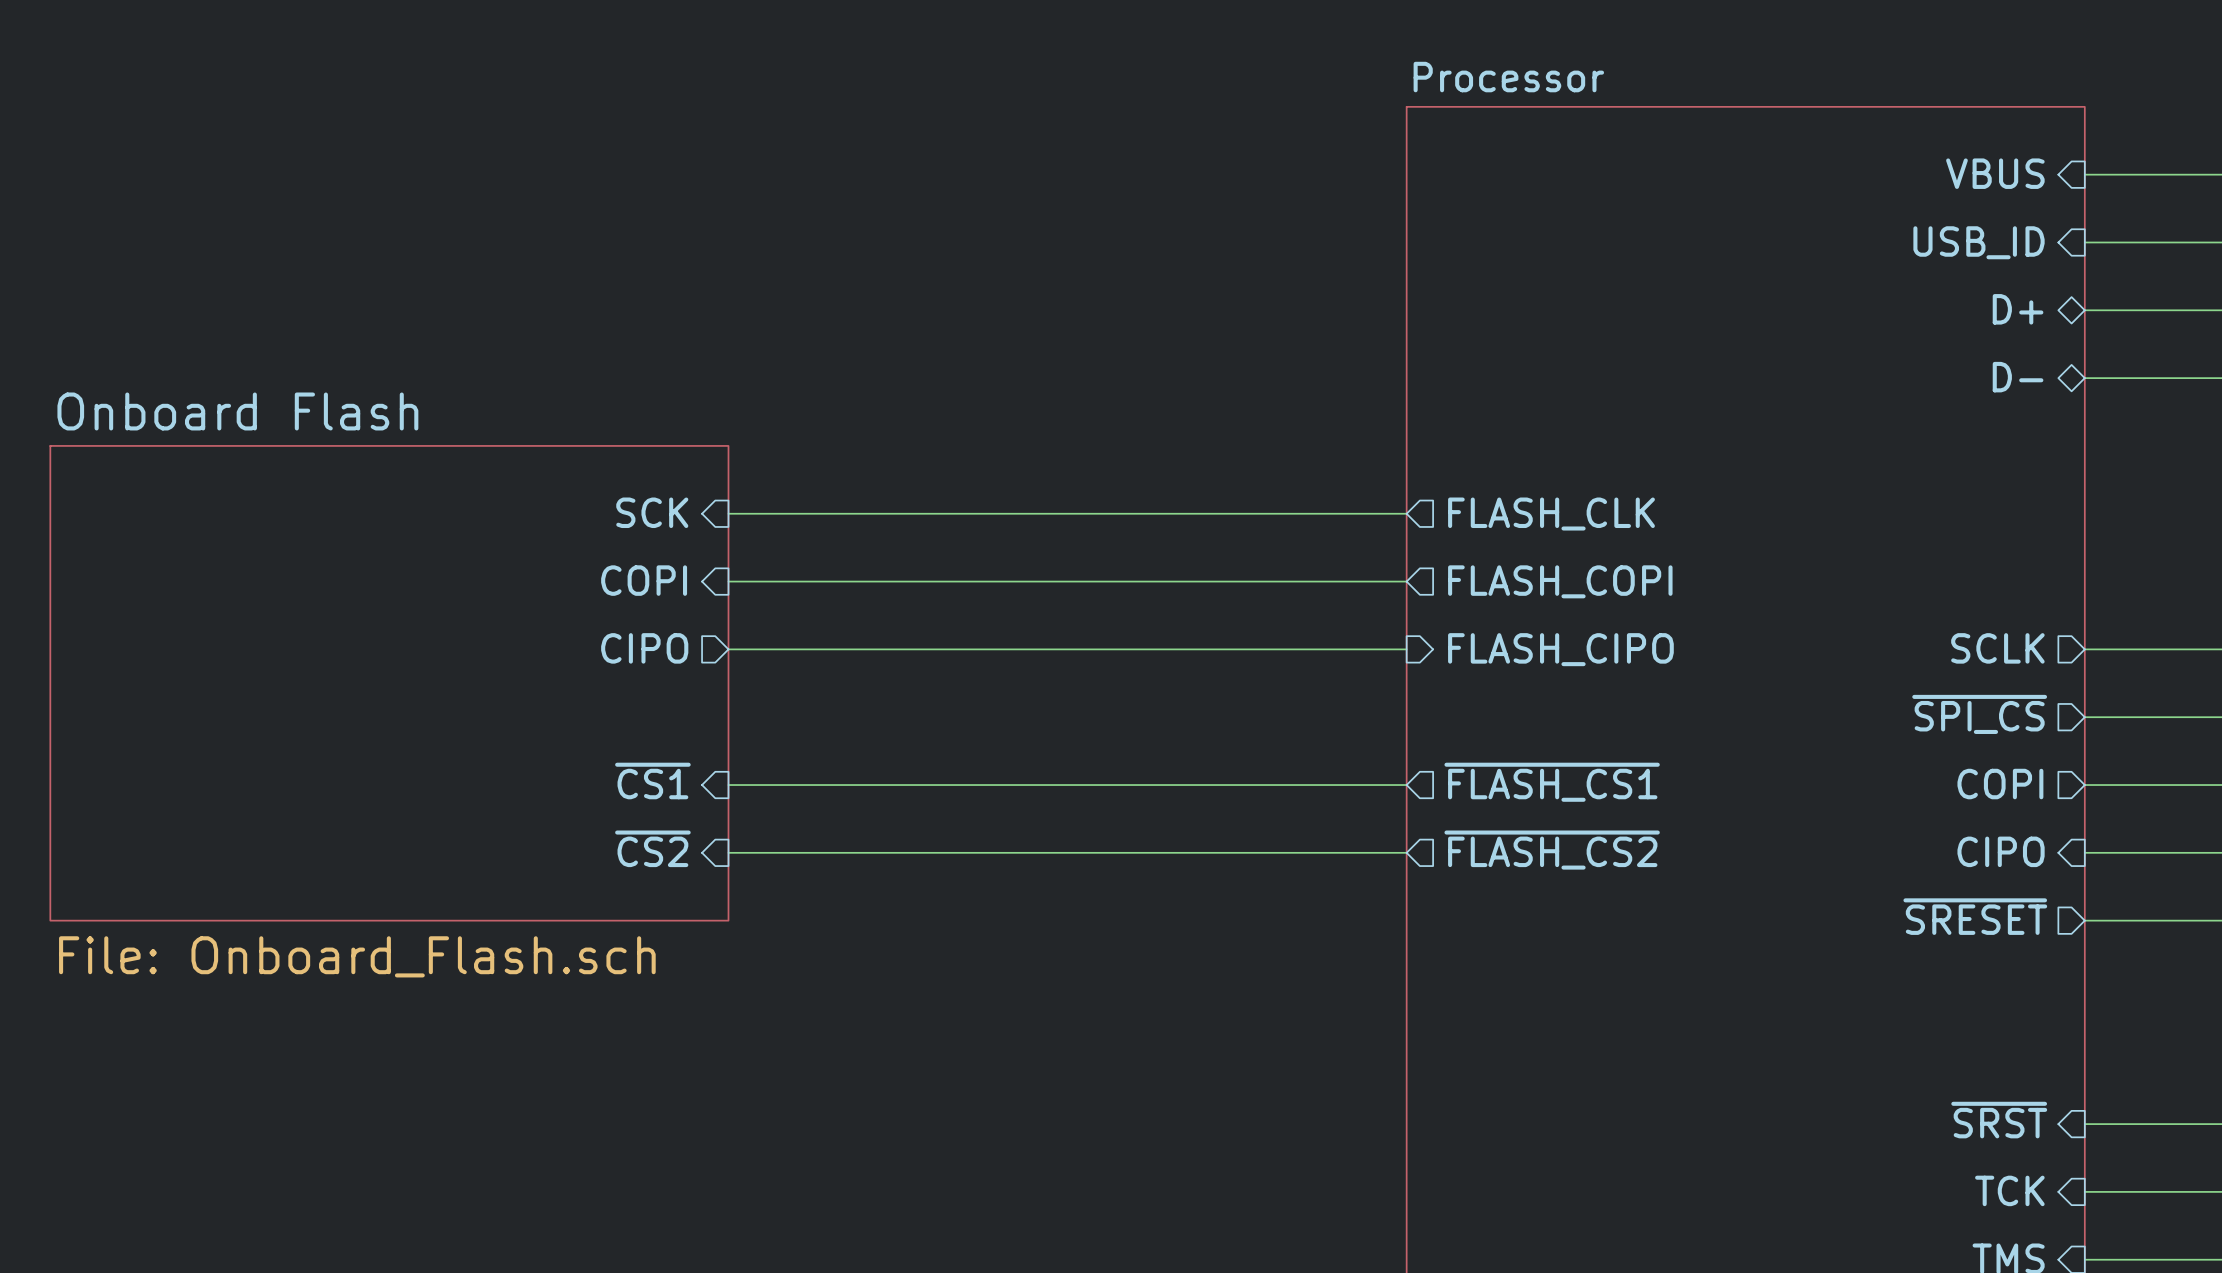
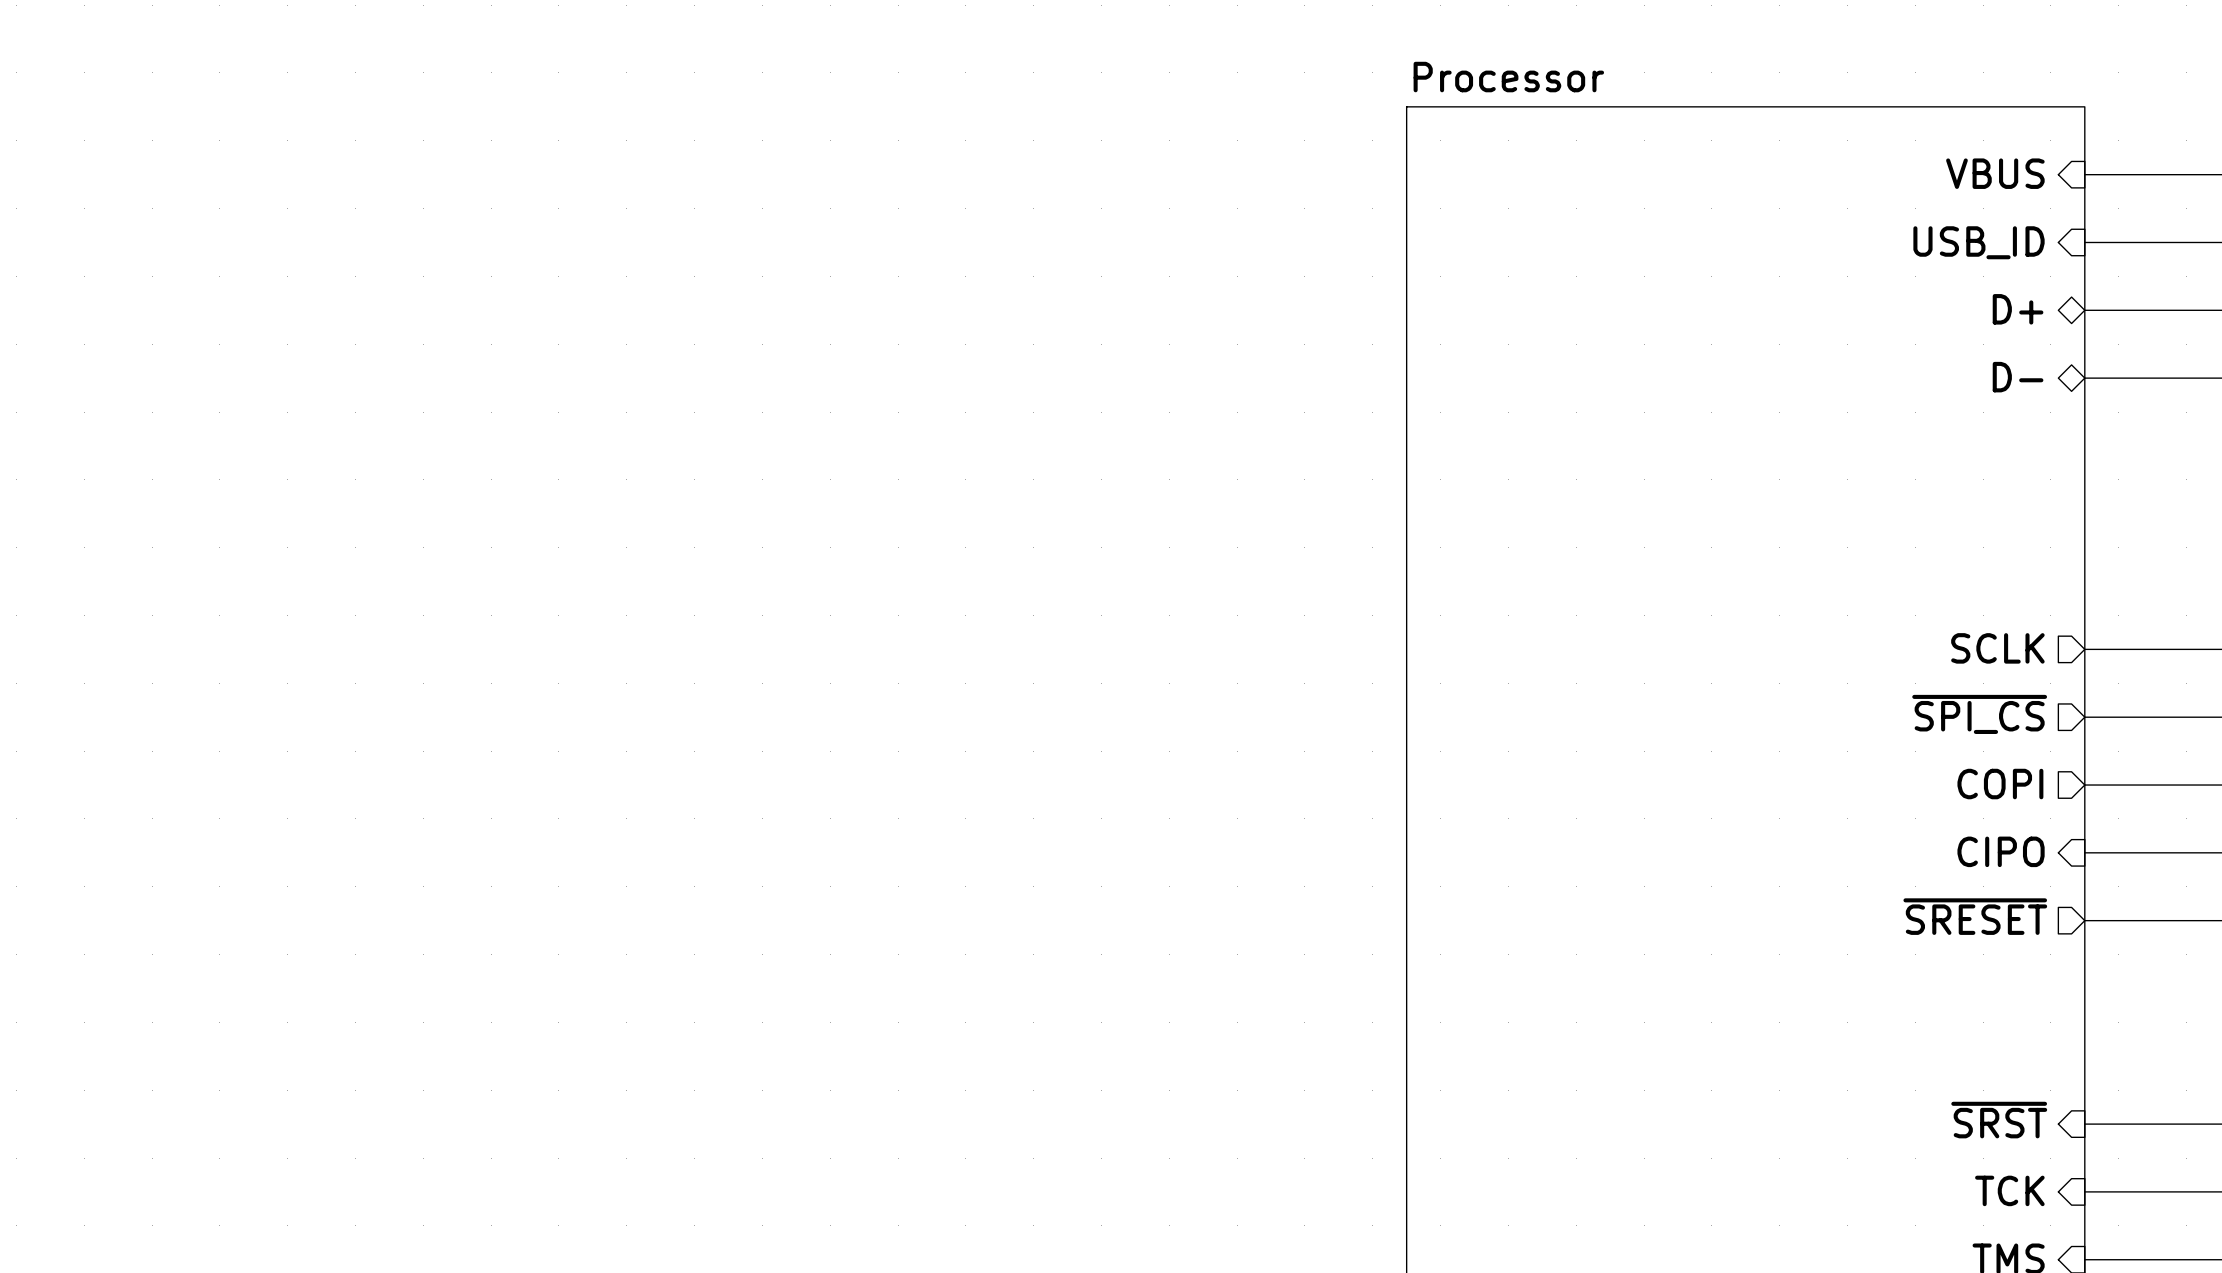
sheet pin: SCK (652, 512) -> none
wire: (728, 513) (1406, 513) -> none
sheet pin: FLASH_CLK (1551, 514) -> none
sheet pin: COPI (644, 580) -> none
wire: (728, 581) (1406, 581) -> none
sheet pin: FLASH_COPI (1560, 581) -> none
sheet pin: CIPO (644, 648) -> none
wire: (728, 649) (1406, 649) -> none
sheet pin: FLASH_CIPO (1560, 649) -> none
sheet Onboard Flash: File: Onboard_Flash.sch (389, 683) -> none
sheet pin: ~{CS1} (652, 780) -> none
sheet pin: ~{FLASH_CS1} (1552, 782) -> none
wire: (728, 785) (1406, 785) -> none
sheet pin: ~{CS2} (652, 848) -> none
sheet pin: ~{FLASH_CS2} (1552, 850) -> none
wire: (728, 852) (1406, 852) -> none

